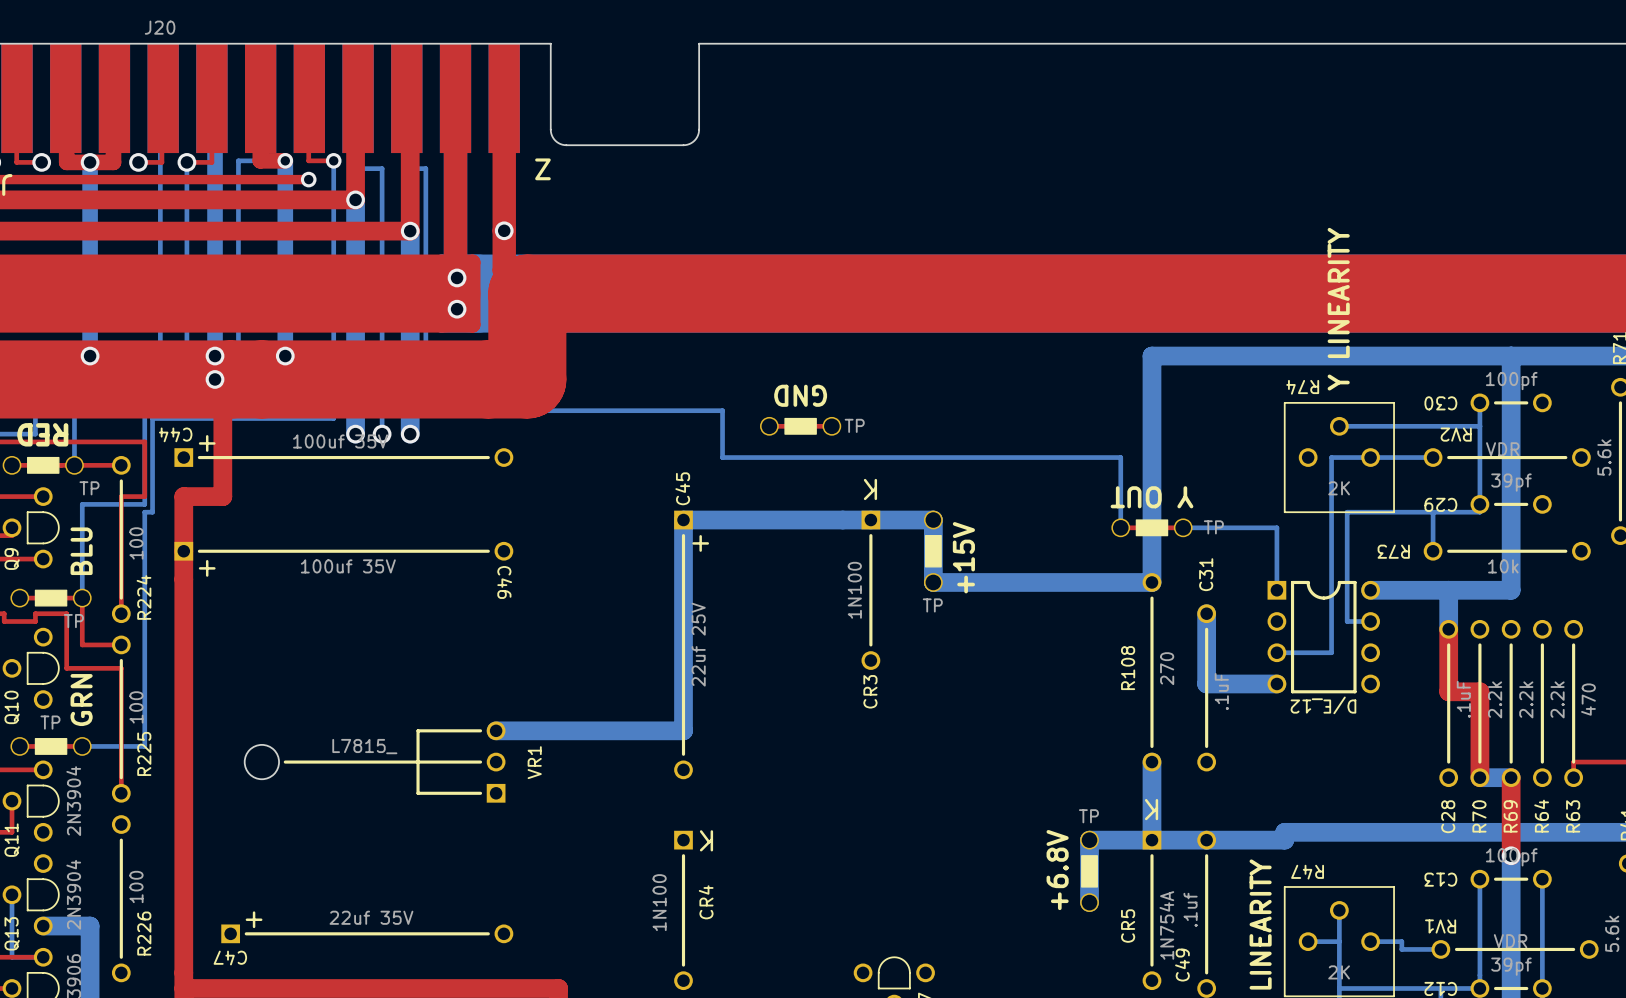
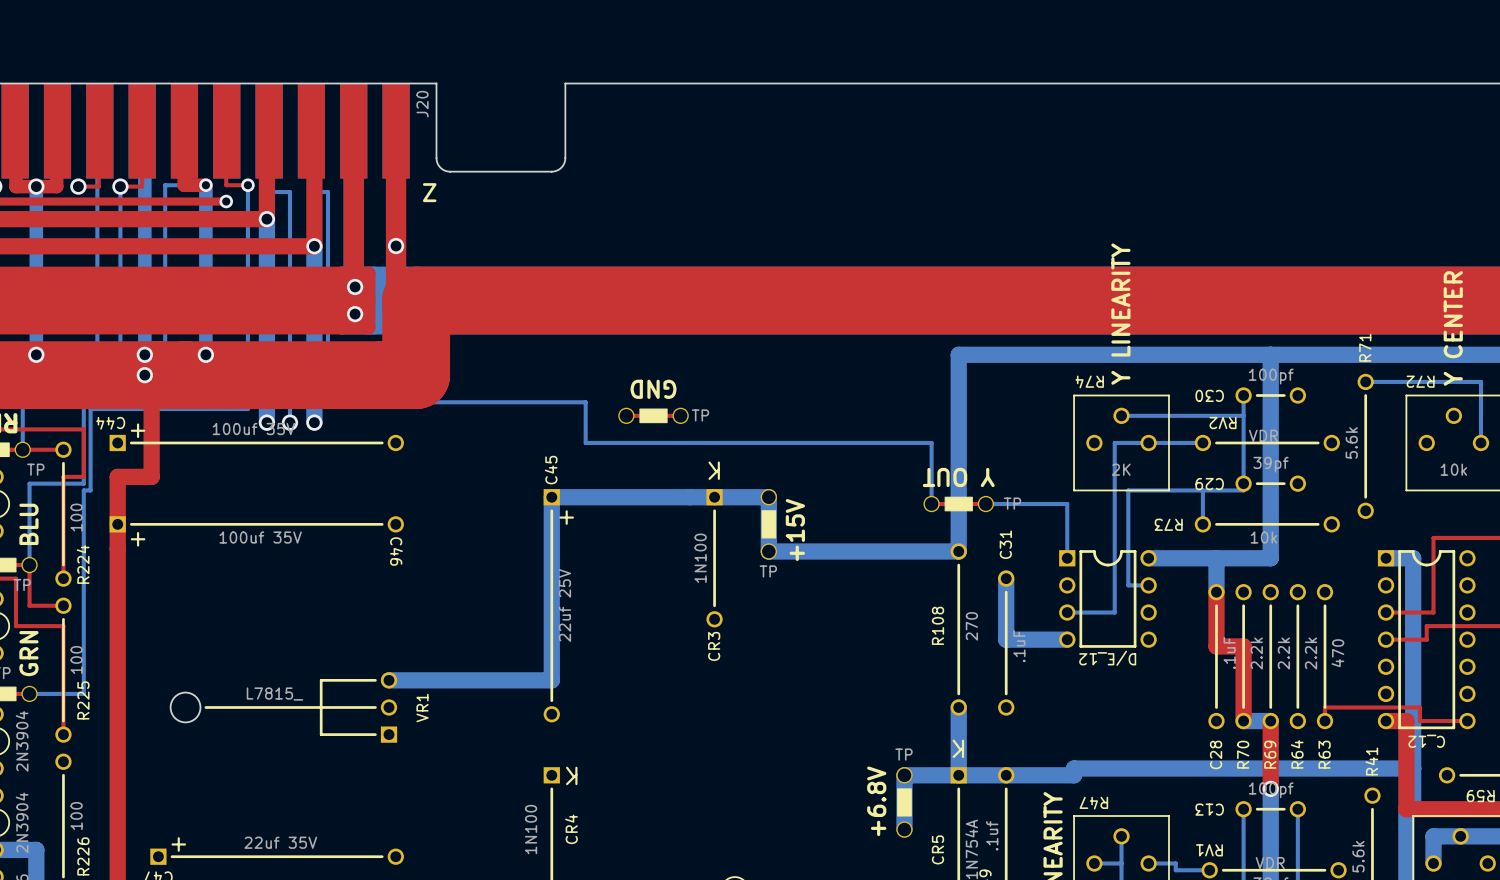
part value rotation: 0° (160, 27) -> 90° counterclockwise (422, 104)
part value position: J20 (160, 27) -> J20 (422, 104)

